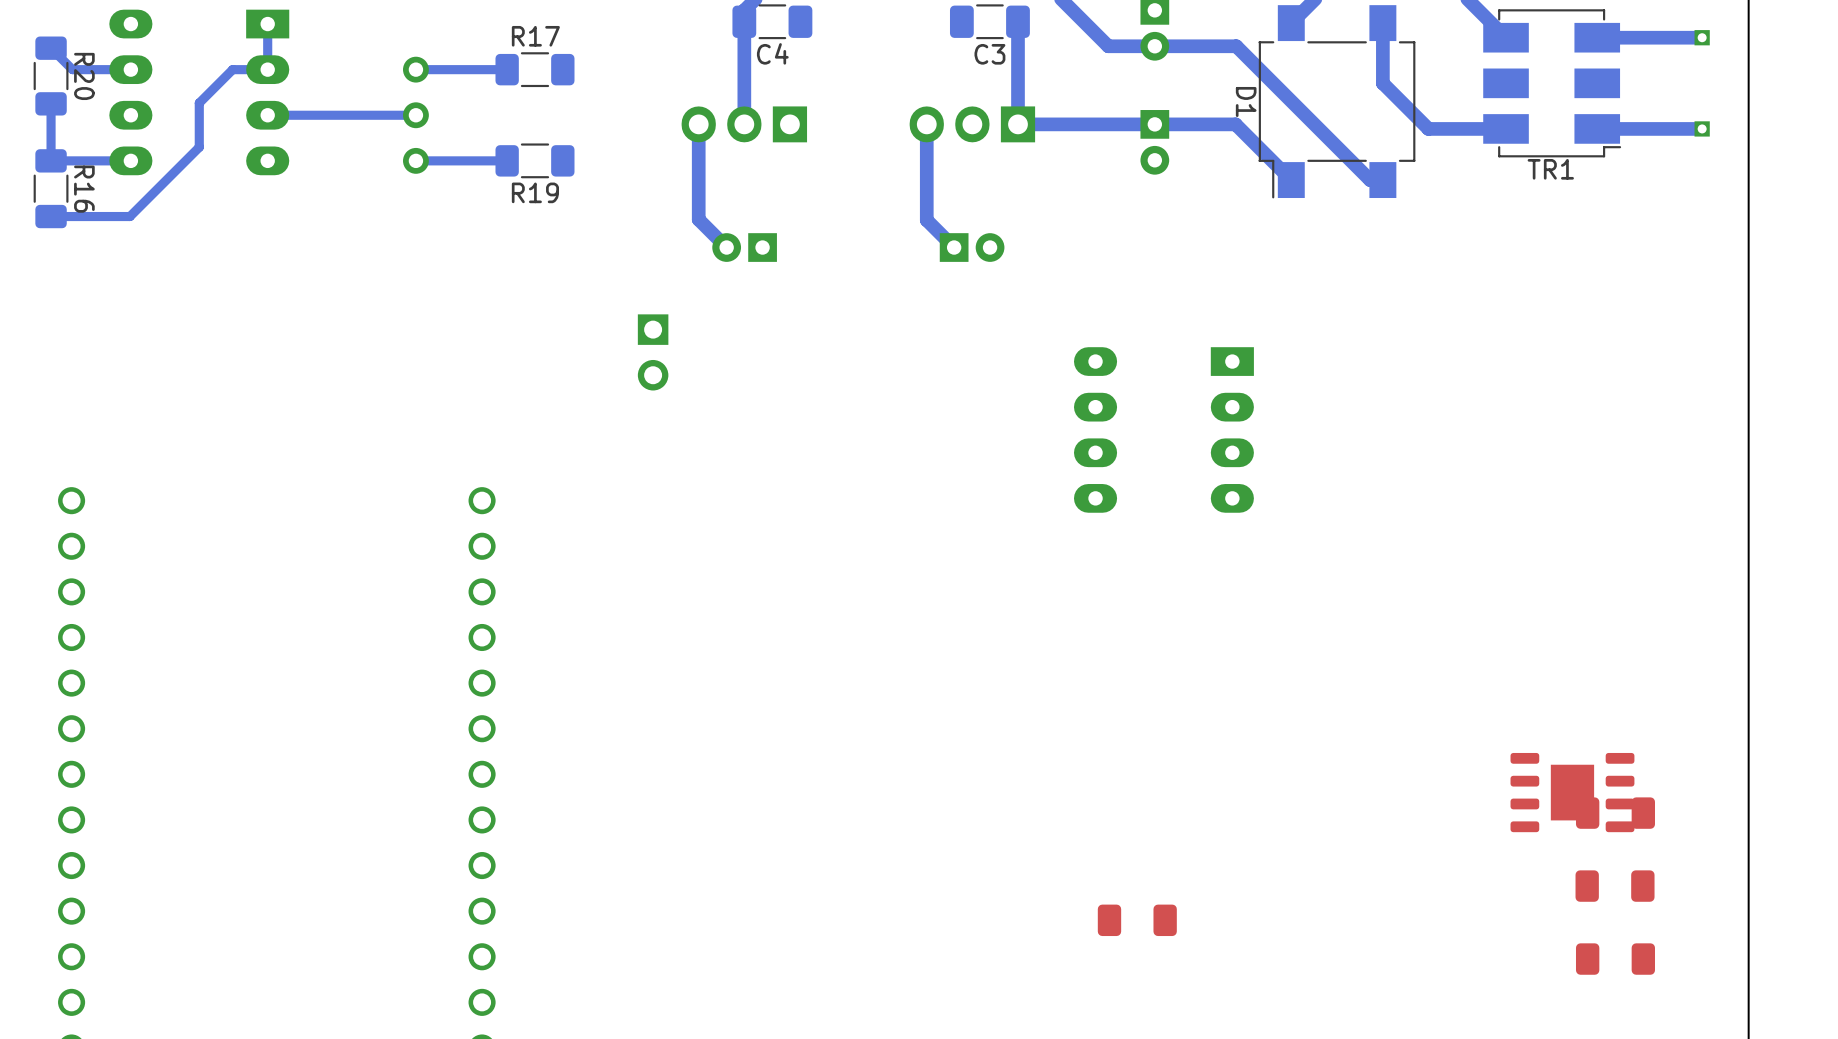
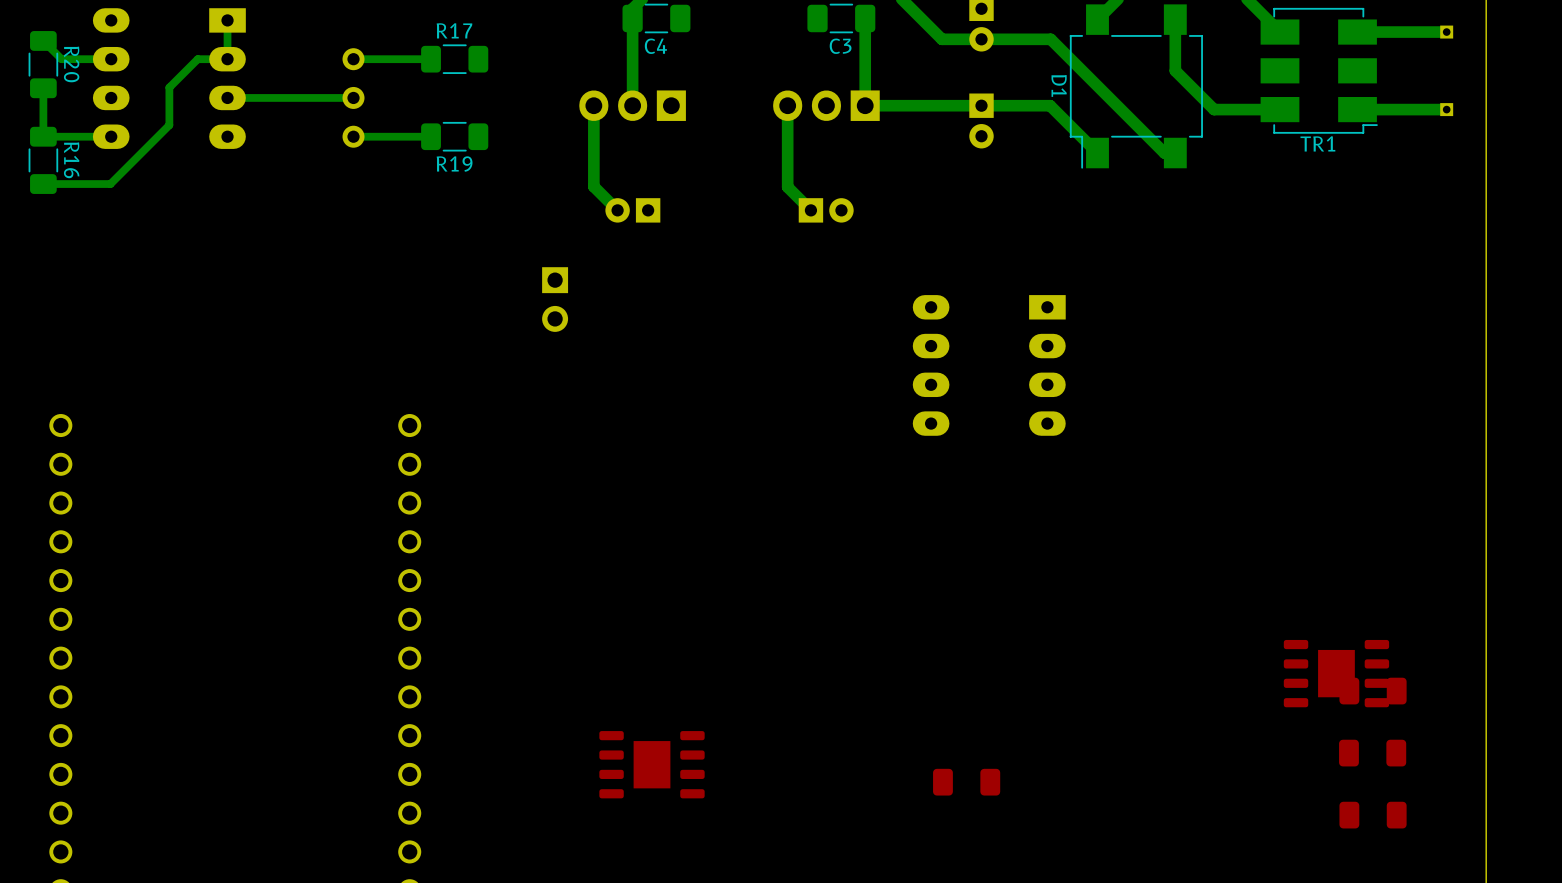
part: none -> (652, 764)

